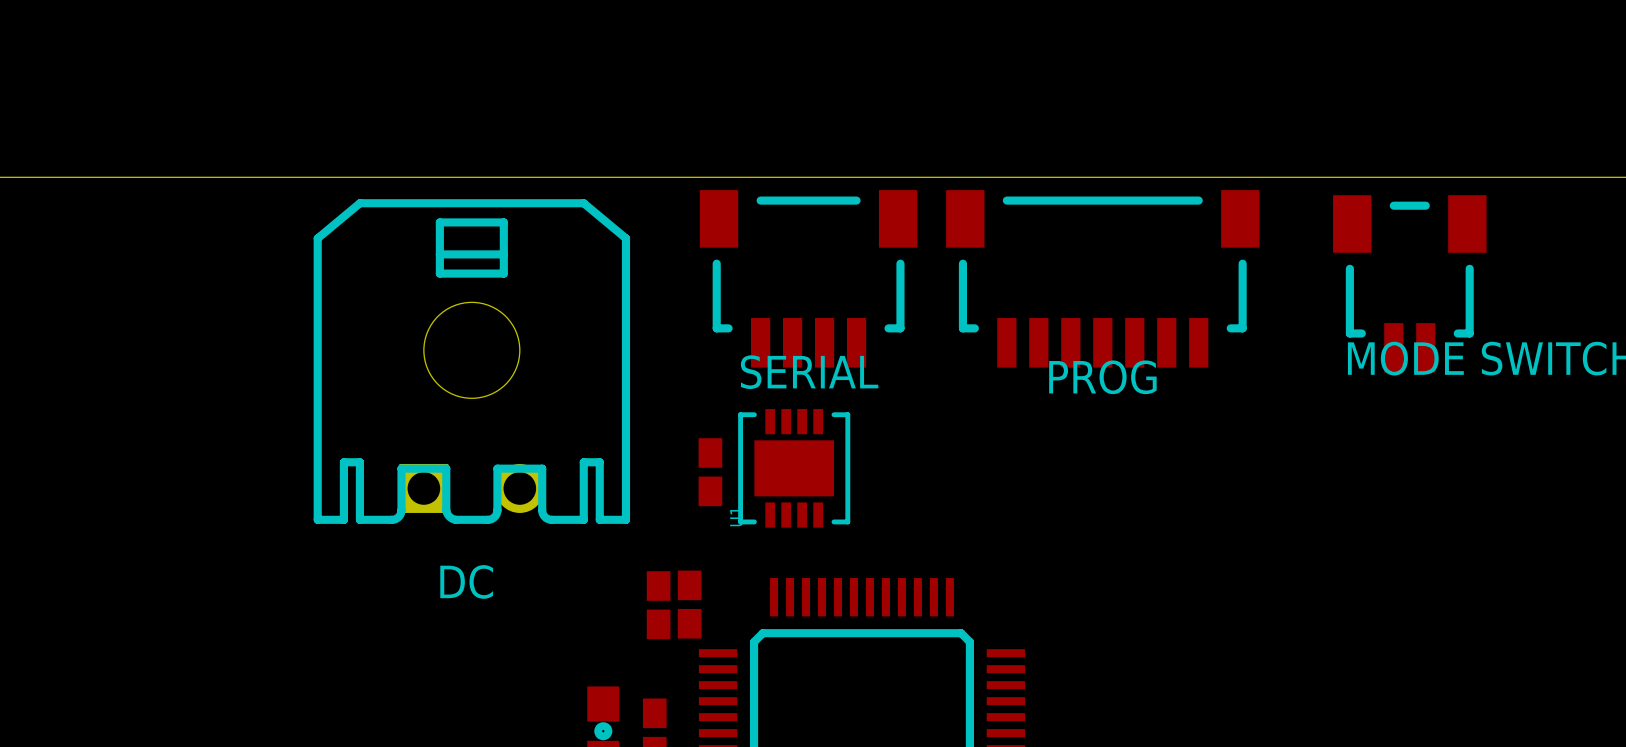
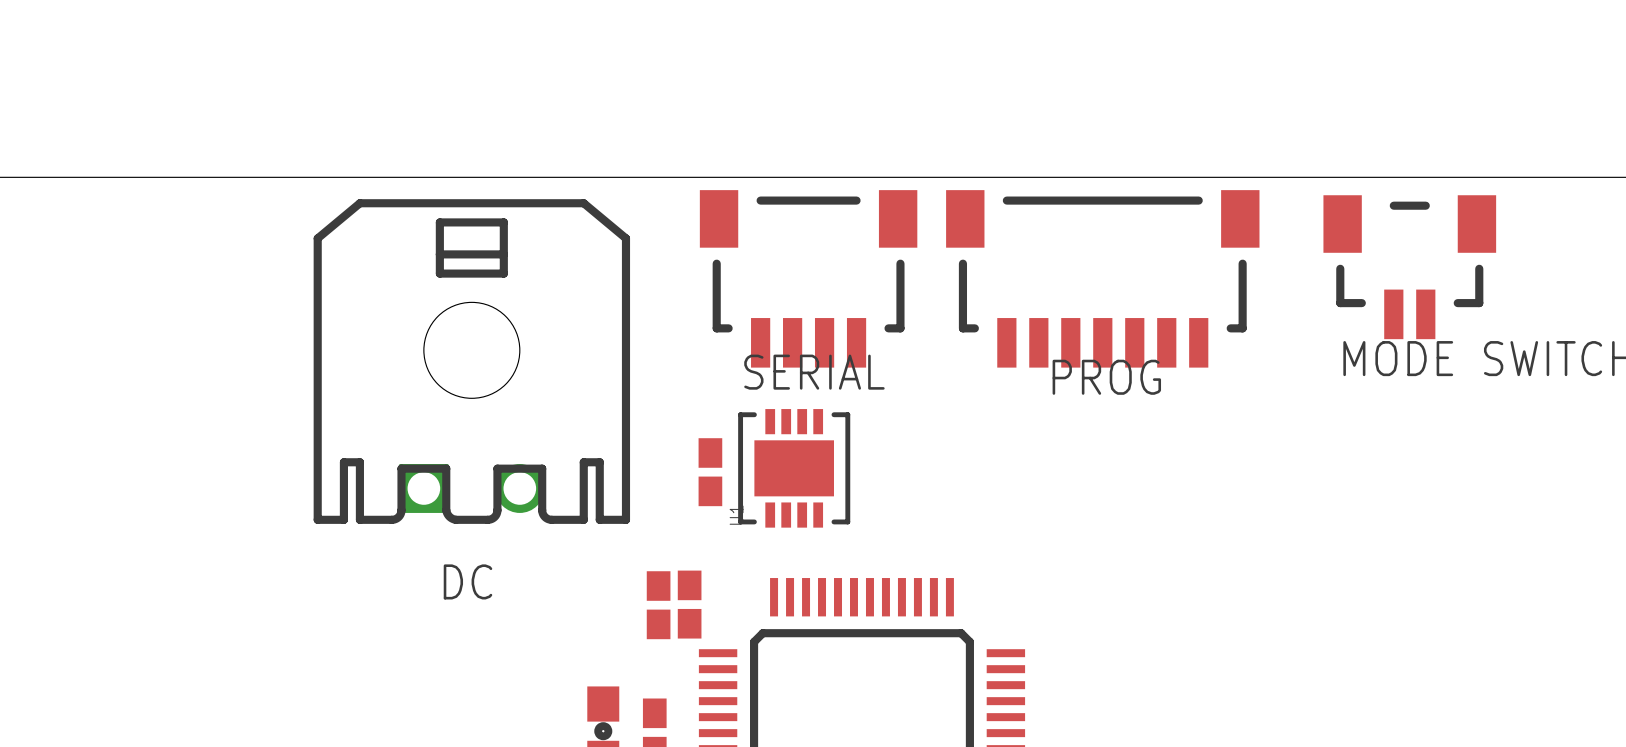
part footprint: [1333, 195, 1487, 373] -> [1323, 195, 1497, 340]

